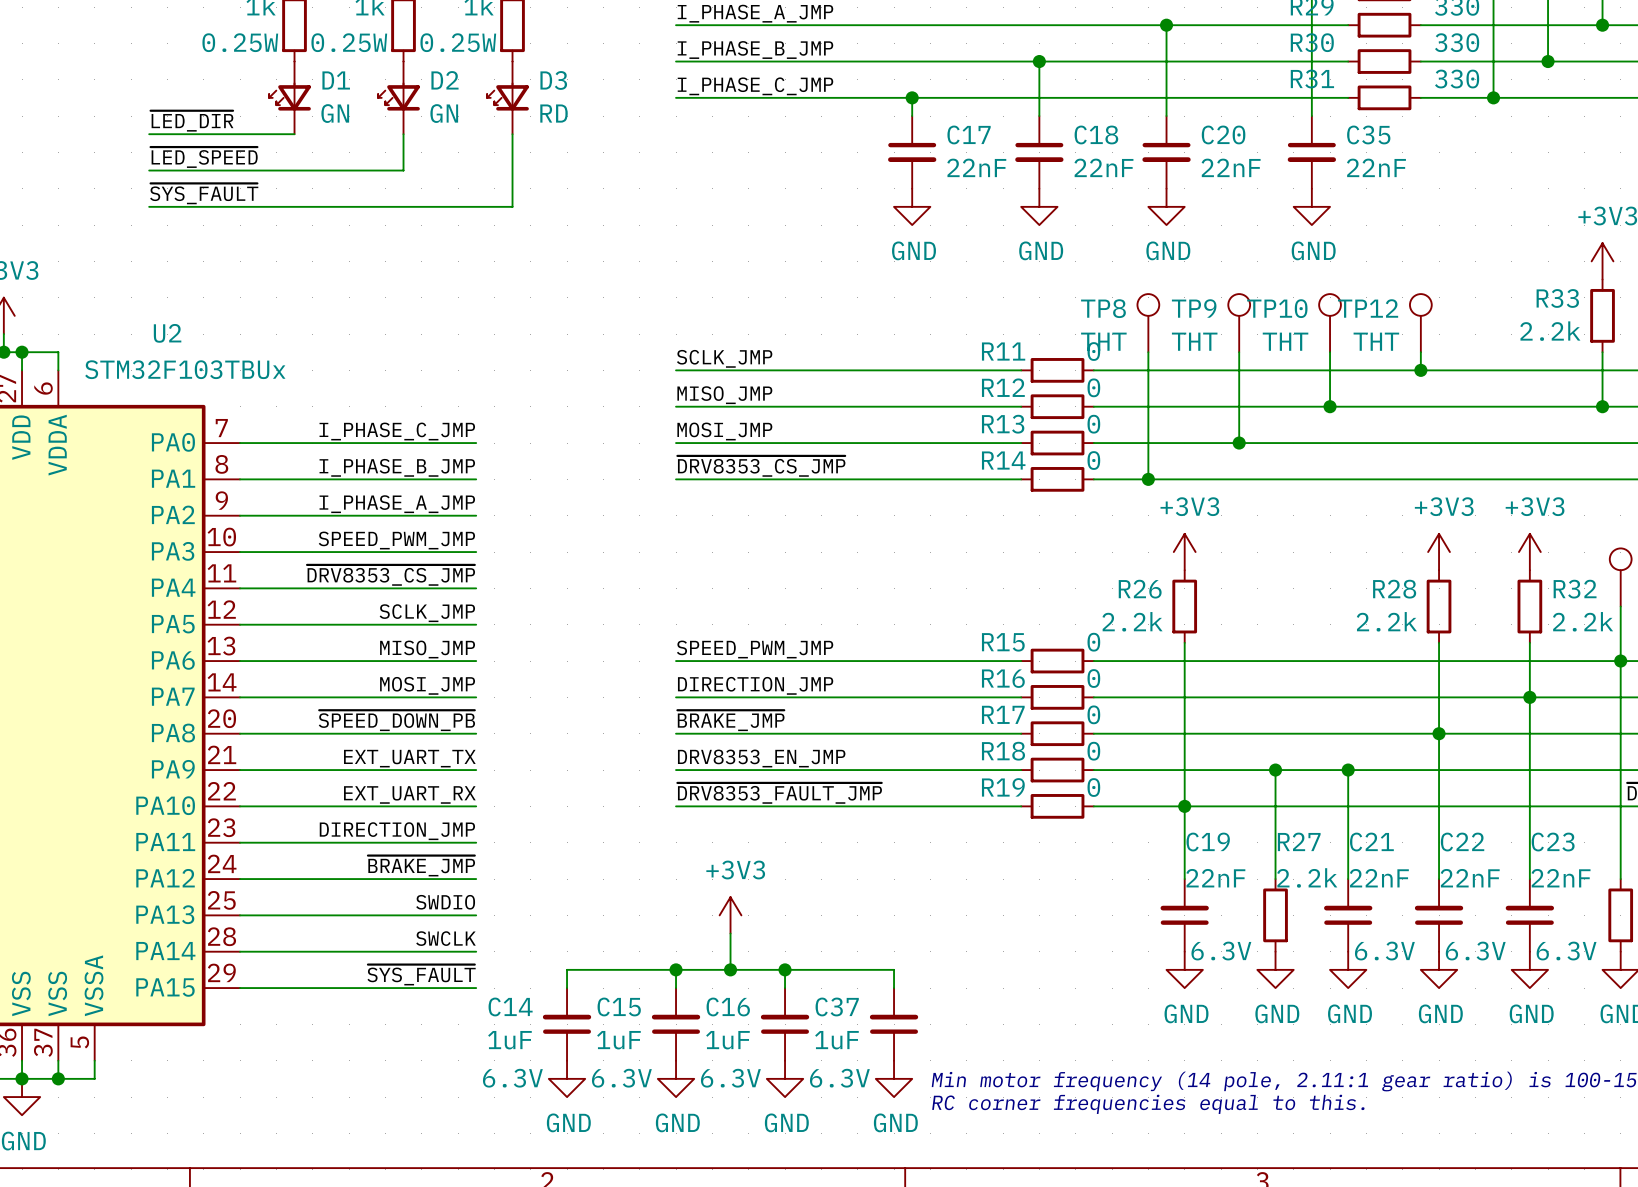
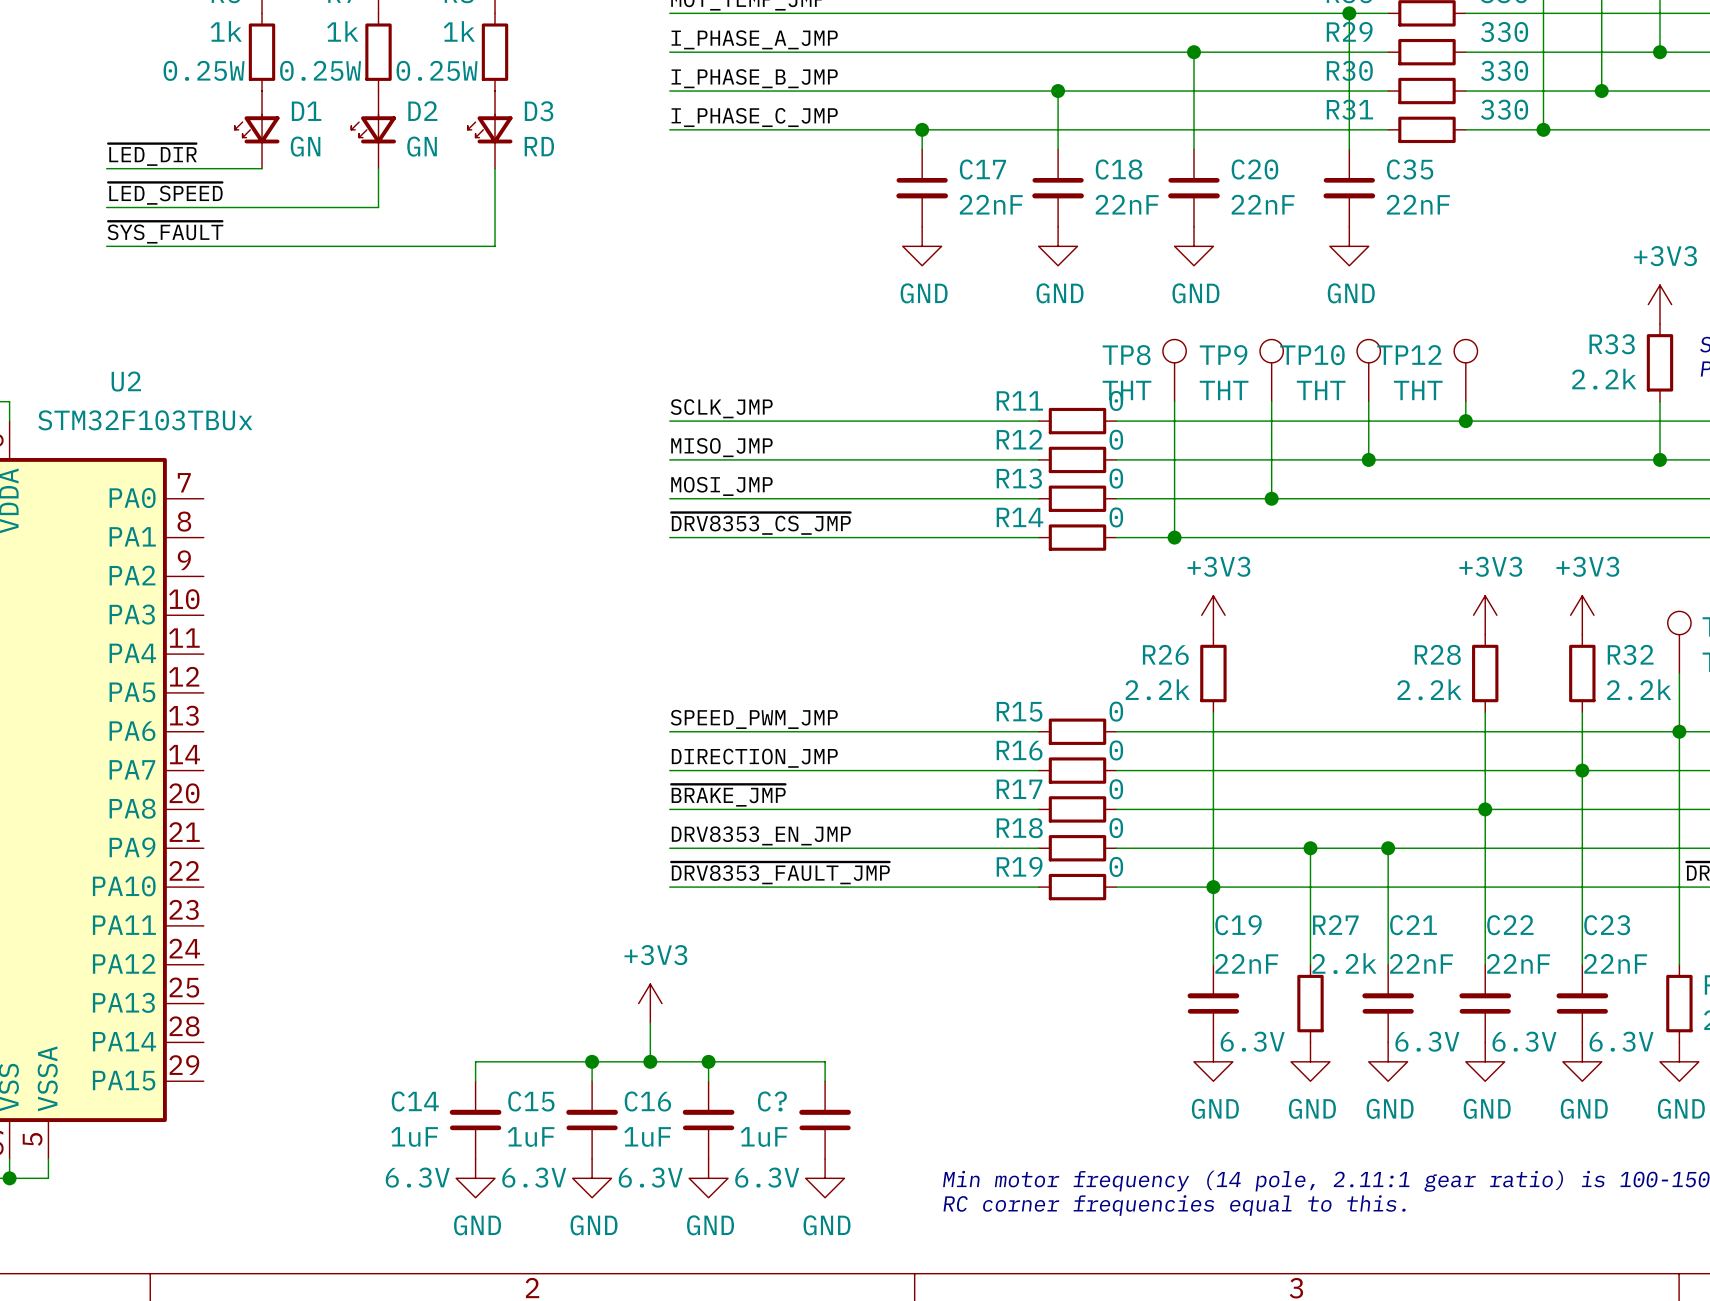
label: I_PHASE_C_JMP (397, 431) -> none
wire: (240, 443) (476, 443) -> none
label: I_PHASE_B_JMP (397, 467) -> none
wire: (240, 479) (476, 479) -> none
label: I_PHASE_A_JMP (397, 504) -> none
wire: (240, 515) (476, 515) -> none
label: SPEED_PWM_JMP (396, 540) -> none
wire: (240, 552) (476, 552) -> none
label: ~{DRV8353_CS_JMP} (391, 575) -> none
wire: (240, 588) (476, 588) -> none
label: SCLK_JMP (427, 613) -> none
wire: (240, 624) (476, 624) -> none
label: MISO_JMP (427, 649) -> none
wire: (240, 661) (476, 661) -> none
label: MOSI_JMP (427, 685) -> none
wire: (240, 697) (476, 697) -> none
label: ~{SPEED_DOWN_PB} (396, 720) -> none
wire: (240, 733) (476, 733) -> none
label: EXT_UART_TX (409, 758) -> none
wire: (240, 770) (476, 770) -> none
label: EXT_UART_RX (409, 794) -> none
wire: (240, 806) (476, 806) -> none
label: DIRECTION_JMP (397, 831) -> none
wire: (240, 842) (476, 842) -> none
label: ~{BRAKE_JMP} (421, 866) -> none
wire: (240, 879) (476, 879) -> none
label: SWDIO (445, 902) -> none
wire: (240, 915) (476, 915) -> none
power symbol position: +3V3 (730, 915) -> +3V3 (650, 1003)
wire: (730, 933) (730, 969) -> (650, 1022) (650, 1061)
label: SWCLK (445, 938) -> none
wire: (240, 951) (476, 951) -> none
wire: (567, 969) (567, 988) -> (553, 1061) (475, 1061) (475, 1081)
junction: none -> (592, 1061)
junction: none -> (650, 1061)
wire: (676, 969) (676, 988) -> (708, 1061) (708, 1081)
junction: (676, 969) -> none
junction: none -> (708, 1061)
junction: (730, 969) -> none
wire: (785, 969) (785, 988) -> (592, 1061) (592, 1081)
junction: (785, 969) -> none
wire: (821, 969) (894, 969) (894, 988) -> (825, 1061) (825, 1081)
label: ~{SYS_FAULT} (421, 975) -> none
wire: (240, 988) (476, 988) -> none
C14 position: (567, 1024) -> (475, 1120)
C15 position: (676, 1024) -> (592, 1120)
C16 position: (785, 1024) -> (708, 1120)
C?: none -> 1uF (825, 1120)
C37: 1uF (894, 1024) -> none
power symbol: none -> GND (475, 1178)
power symbol: GND (567, 1078) -> none
power symbol: none -> GND (592, 1178)
power symbol: GND (676, 1078) -> none
power symbol: none -> GND (708, 1178)
power symbol: GND (785, 1078) -> none
power symbol: none -> GND (825, 1178)
power symbol: GND (894, 1078) -> none

